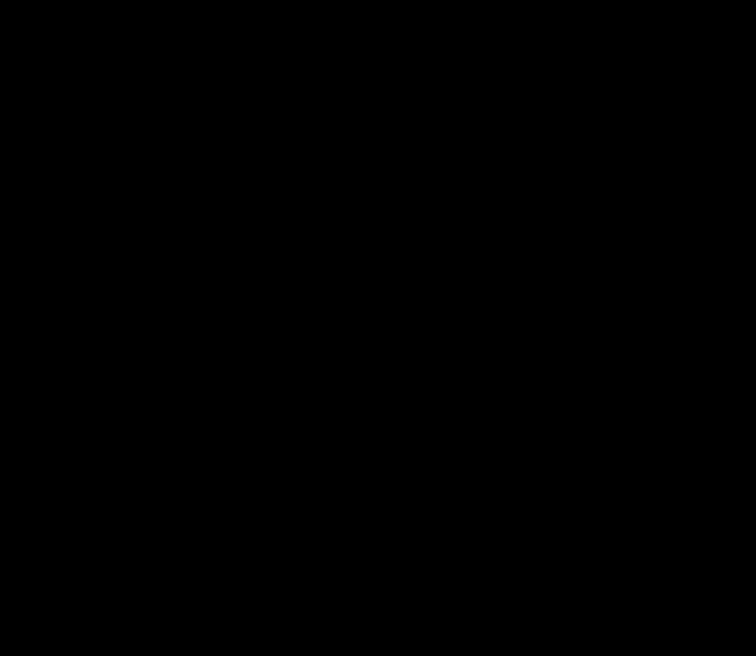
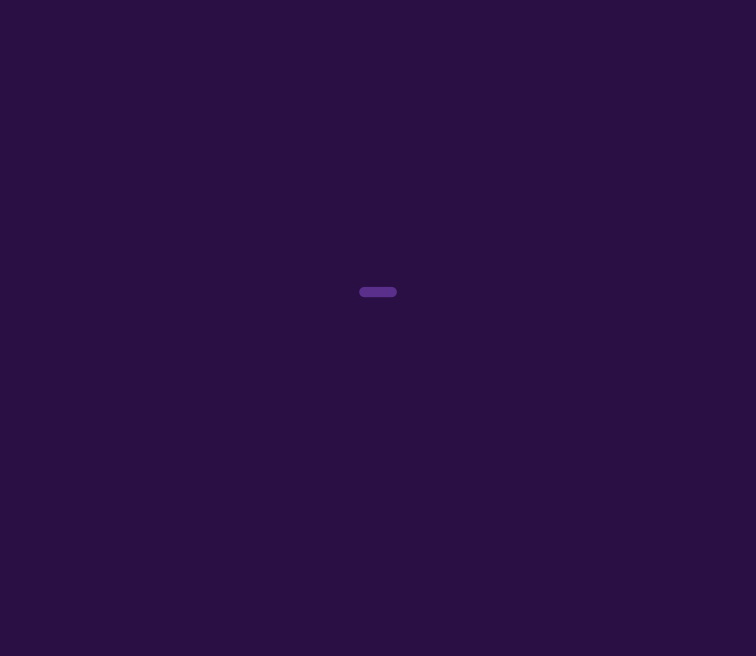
track: none -> (391, 292) (364, 292)

